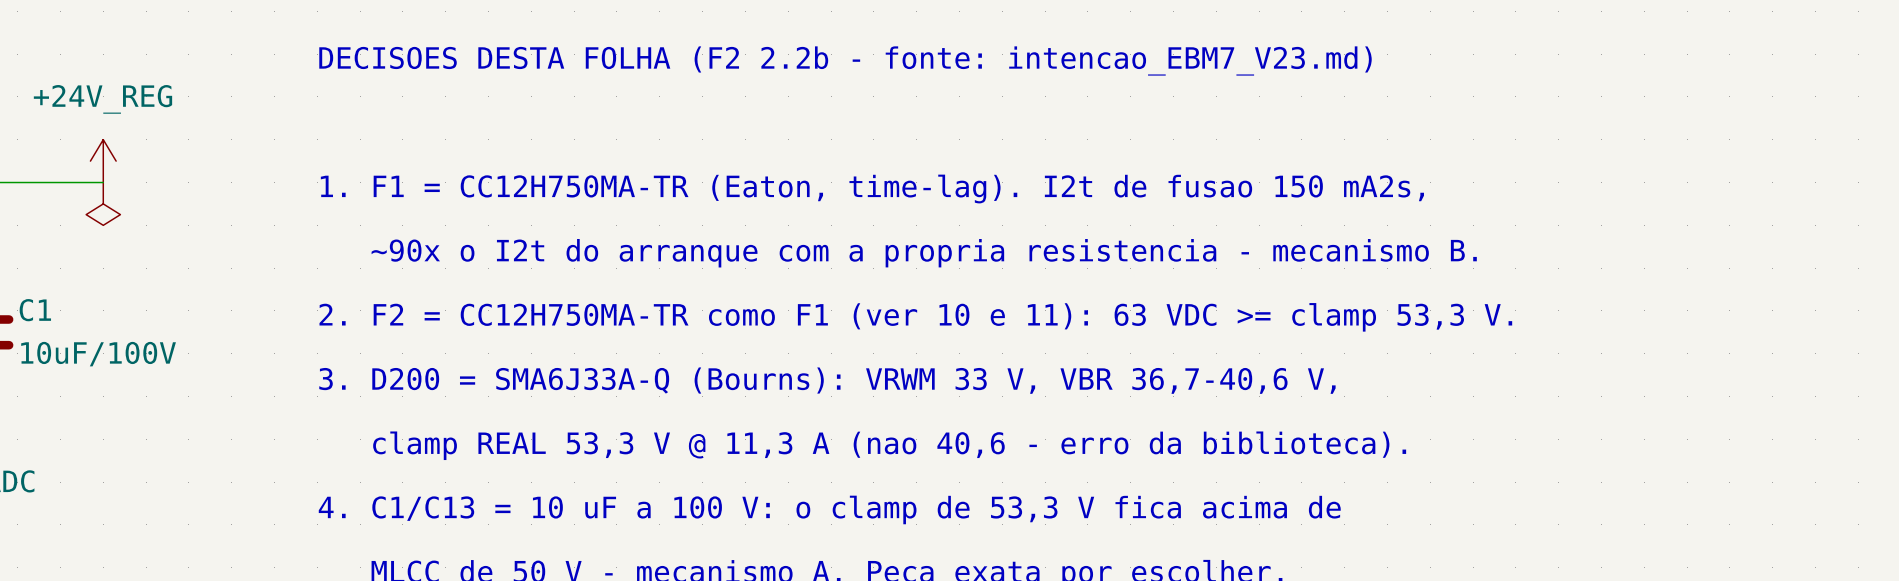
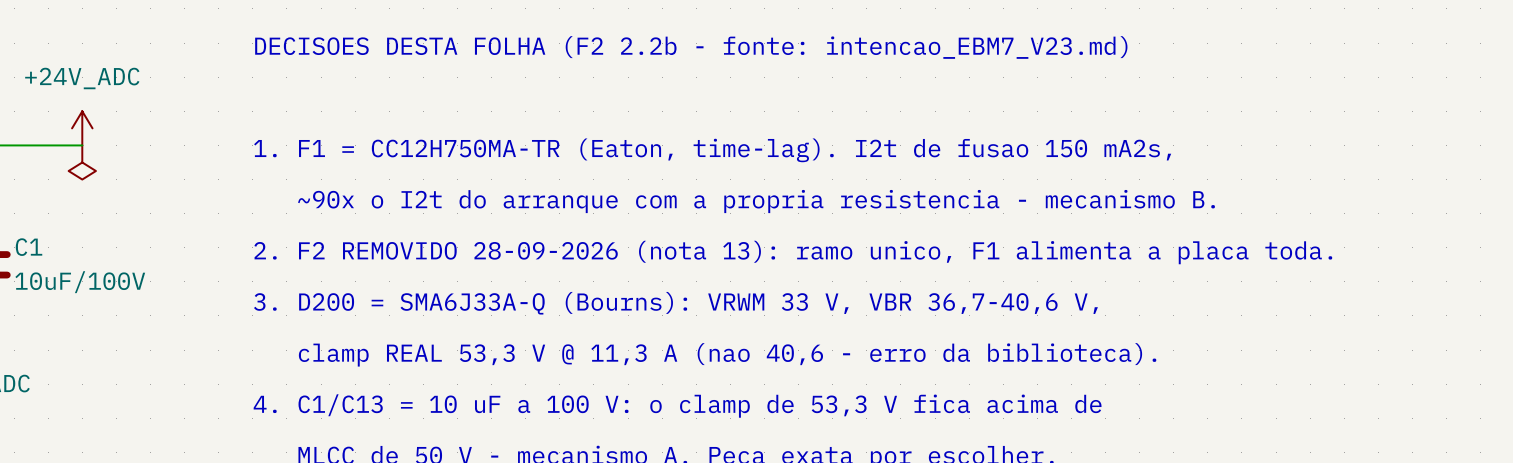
power symbol: +24V_REG (103, 161) -> +24V_ADC (82, 128)
text: 2. F2 = CC12H750MA-TR como F1 (ver 10 e 11): 63 VDC >= clamp 53,3 V. (915, 317) -> 2. F2 REMOVIDO 28-09-2026 (nota 13): ramo unico, F1 alimenta a placa toda. (793, 252)

